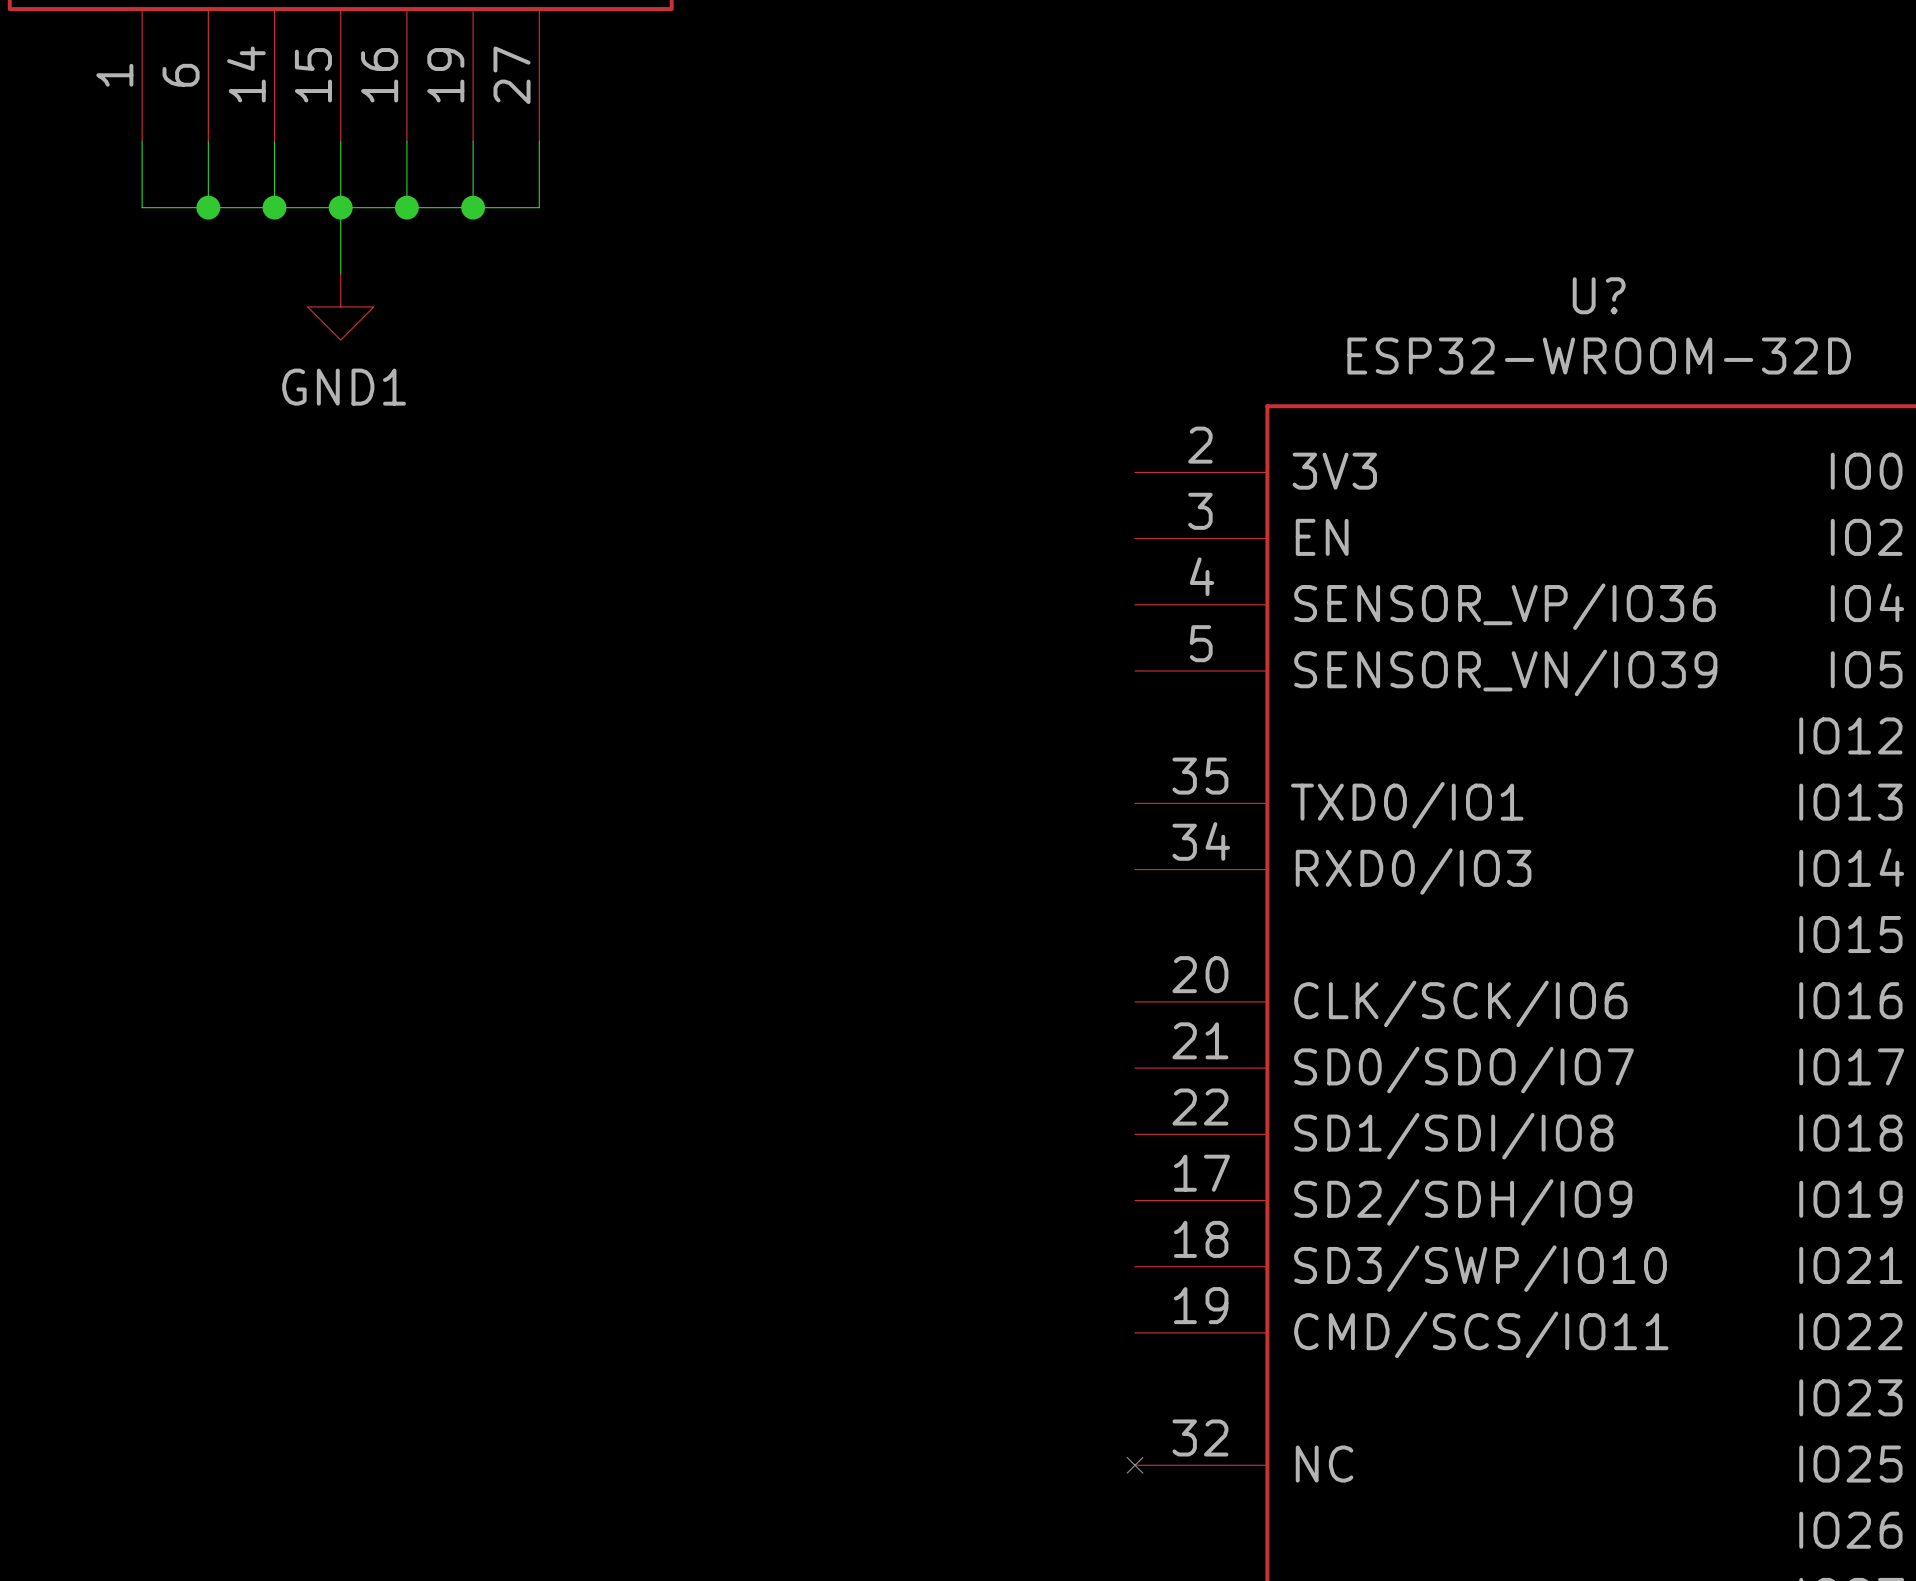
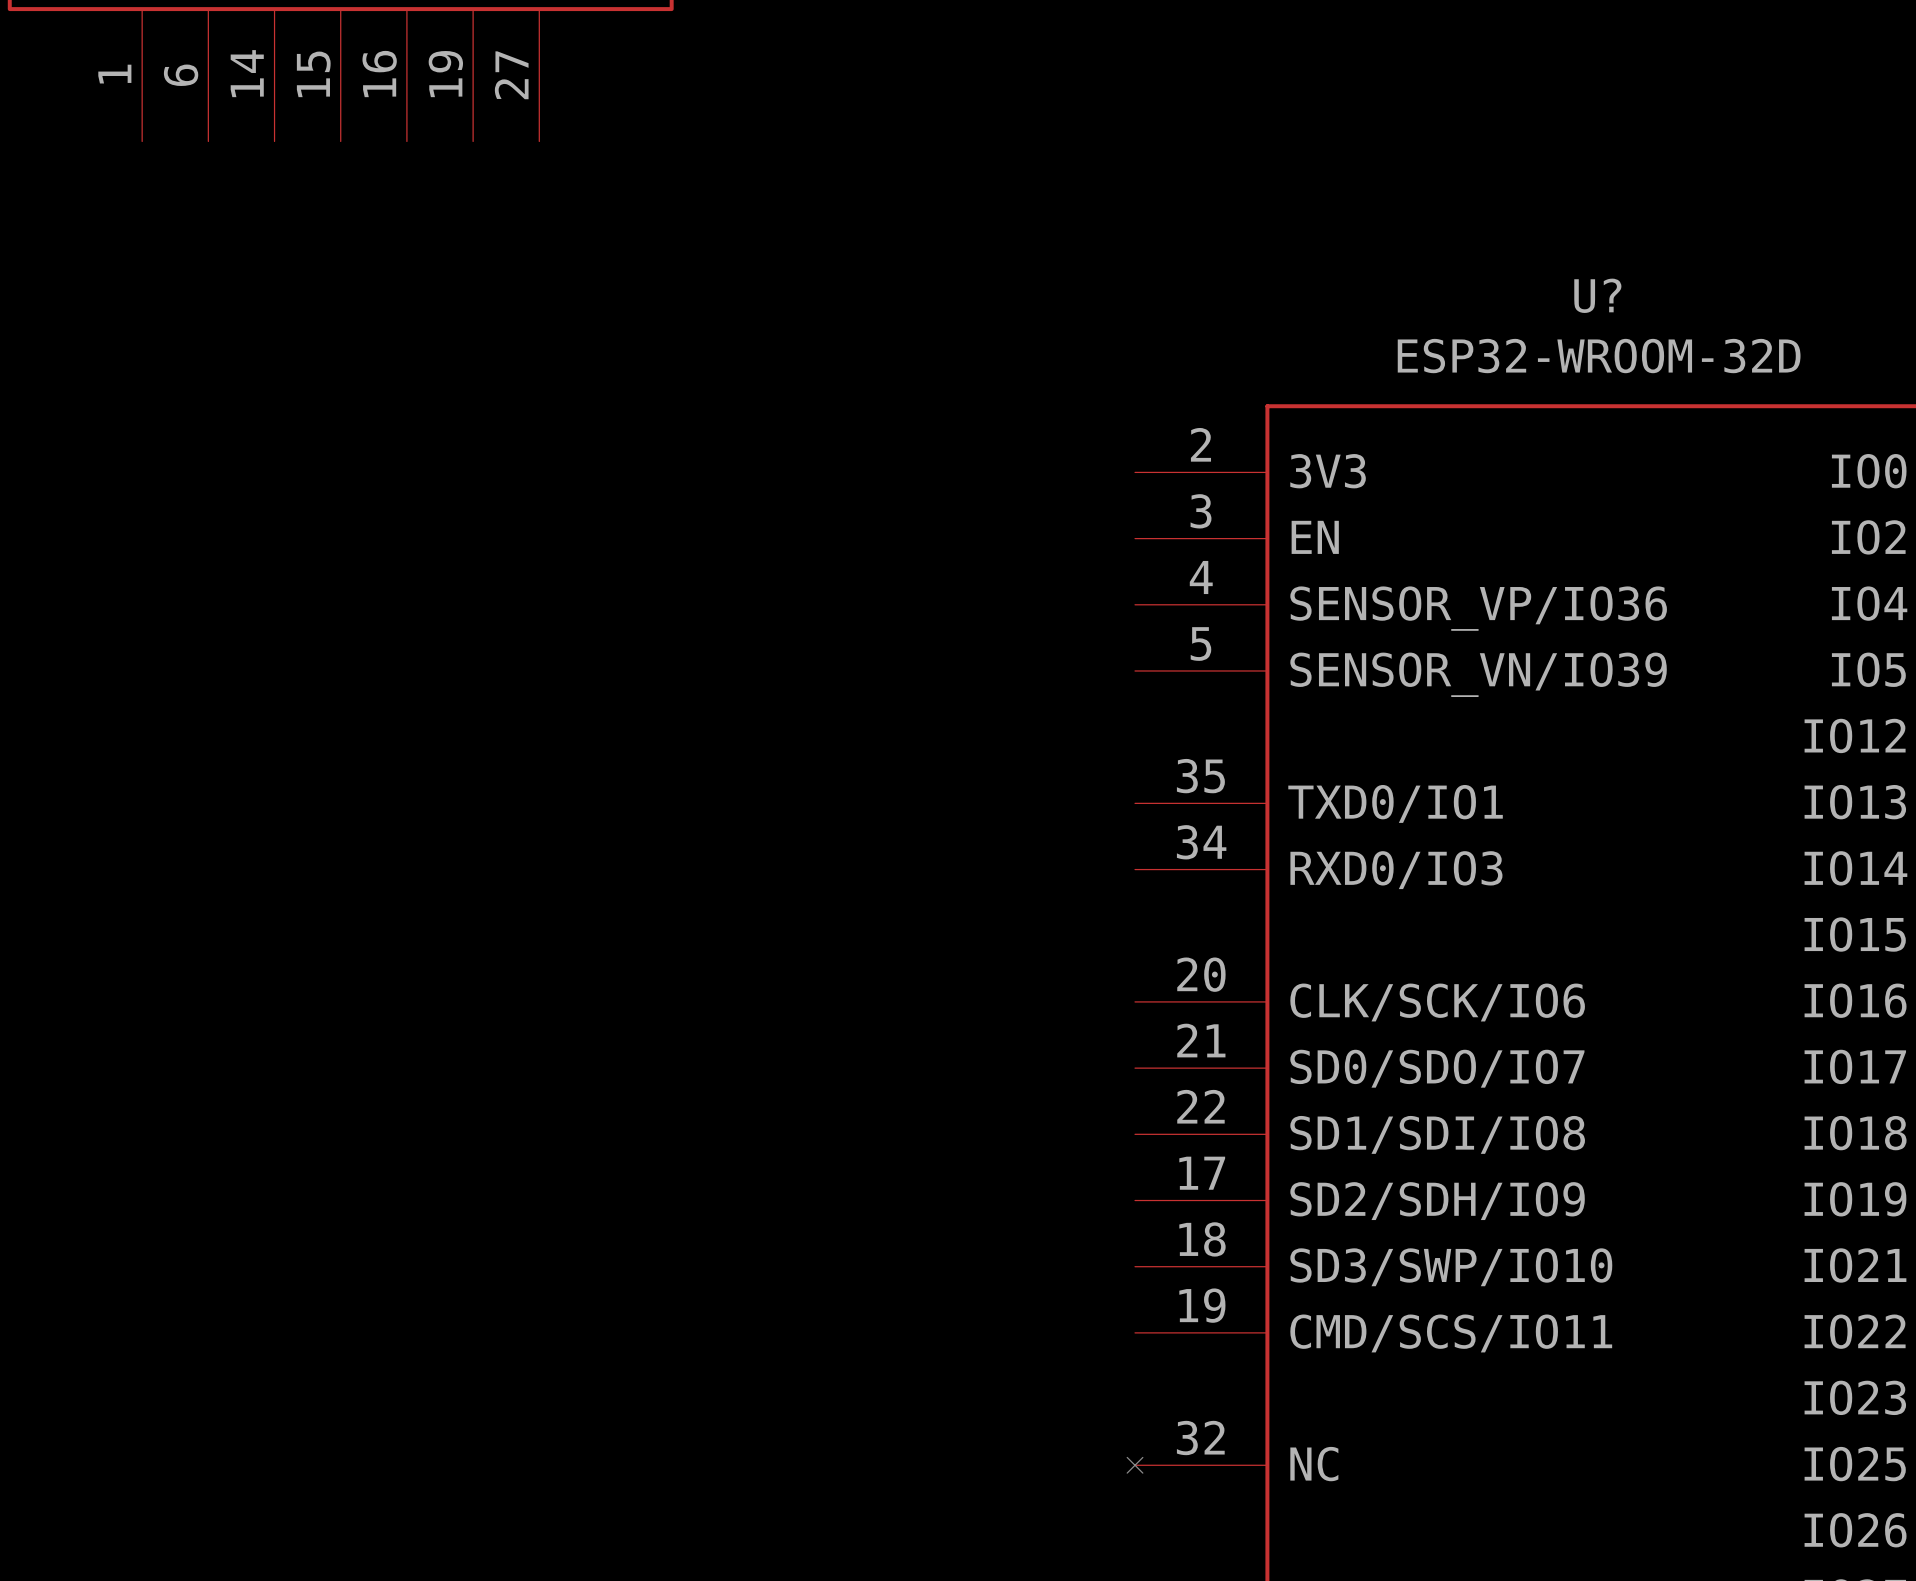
wire: (142, 141) (142, 207) (539, 207) (539, 141) -> none
wire: (208, 141) (208, 207) -> none
wire: (274, 141) (274, 207) -> none
wire: (340, 141) (340, 273) -> none
wire: (406, 141) (406, 207) -> none
wire: (473, 141) (473, 207) -> none
junction: (208, 207) -> none
junction: (274, 207) -> none
junction: (340, 207) -> none
junction: (406, 207) -> none
junction: (473, 207) -> none
power symbol: GND1 (340, 306) -> none

